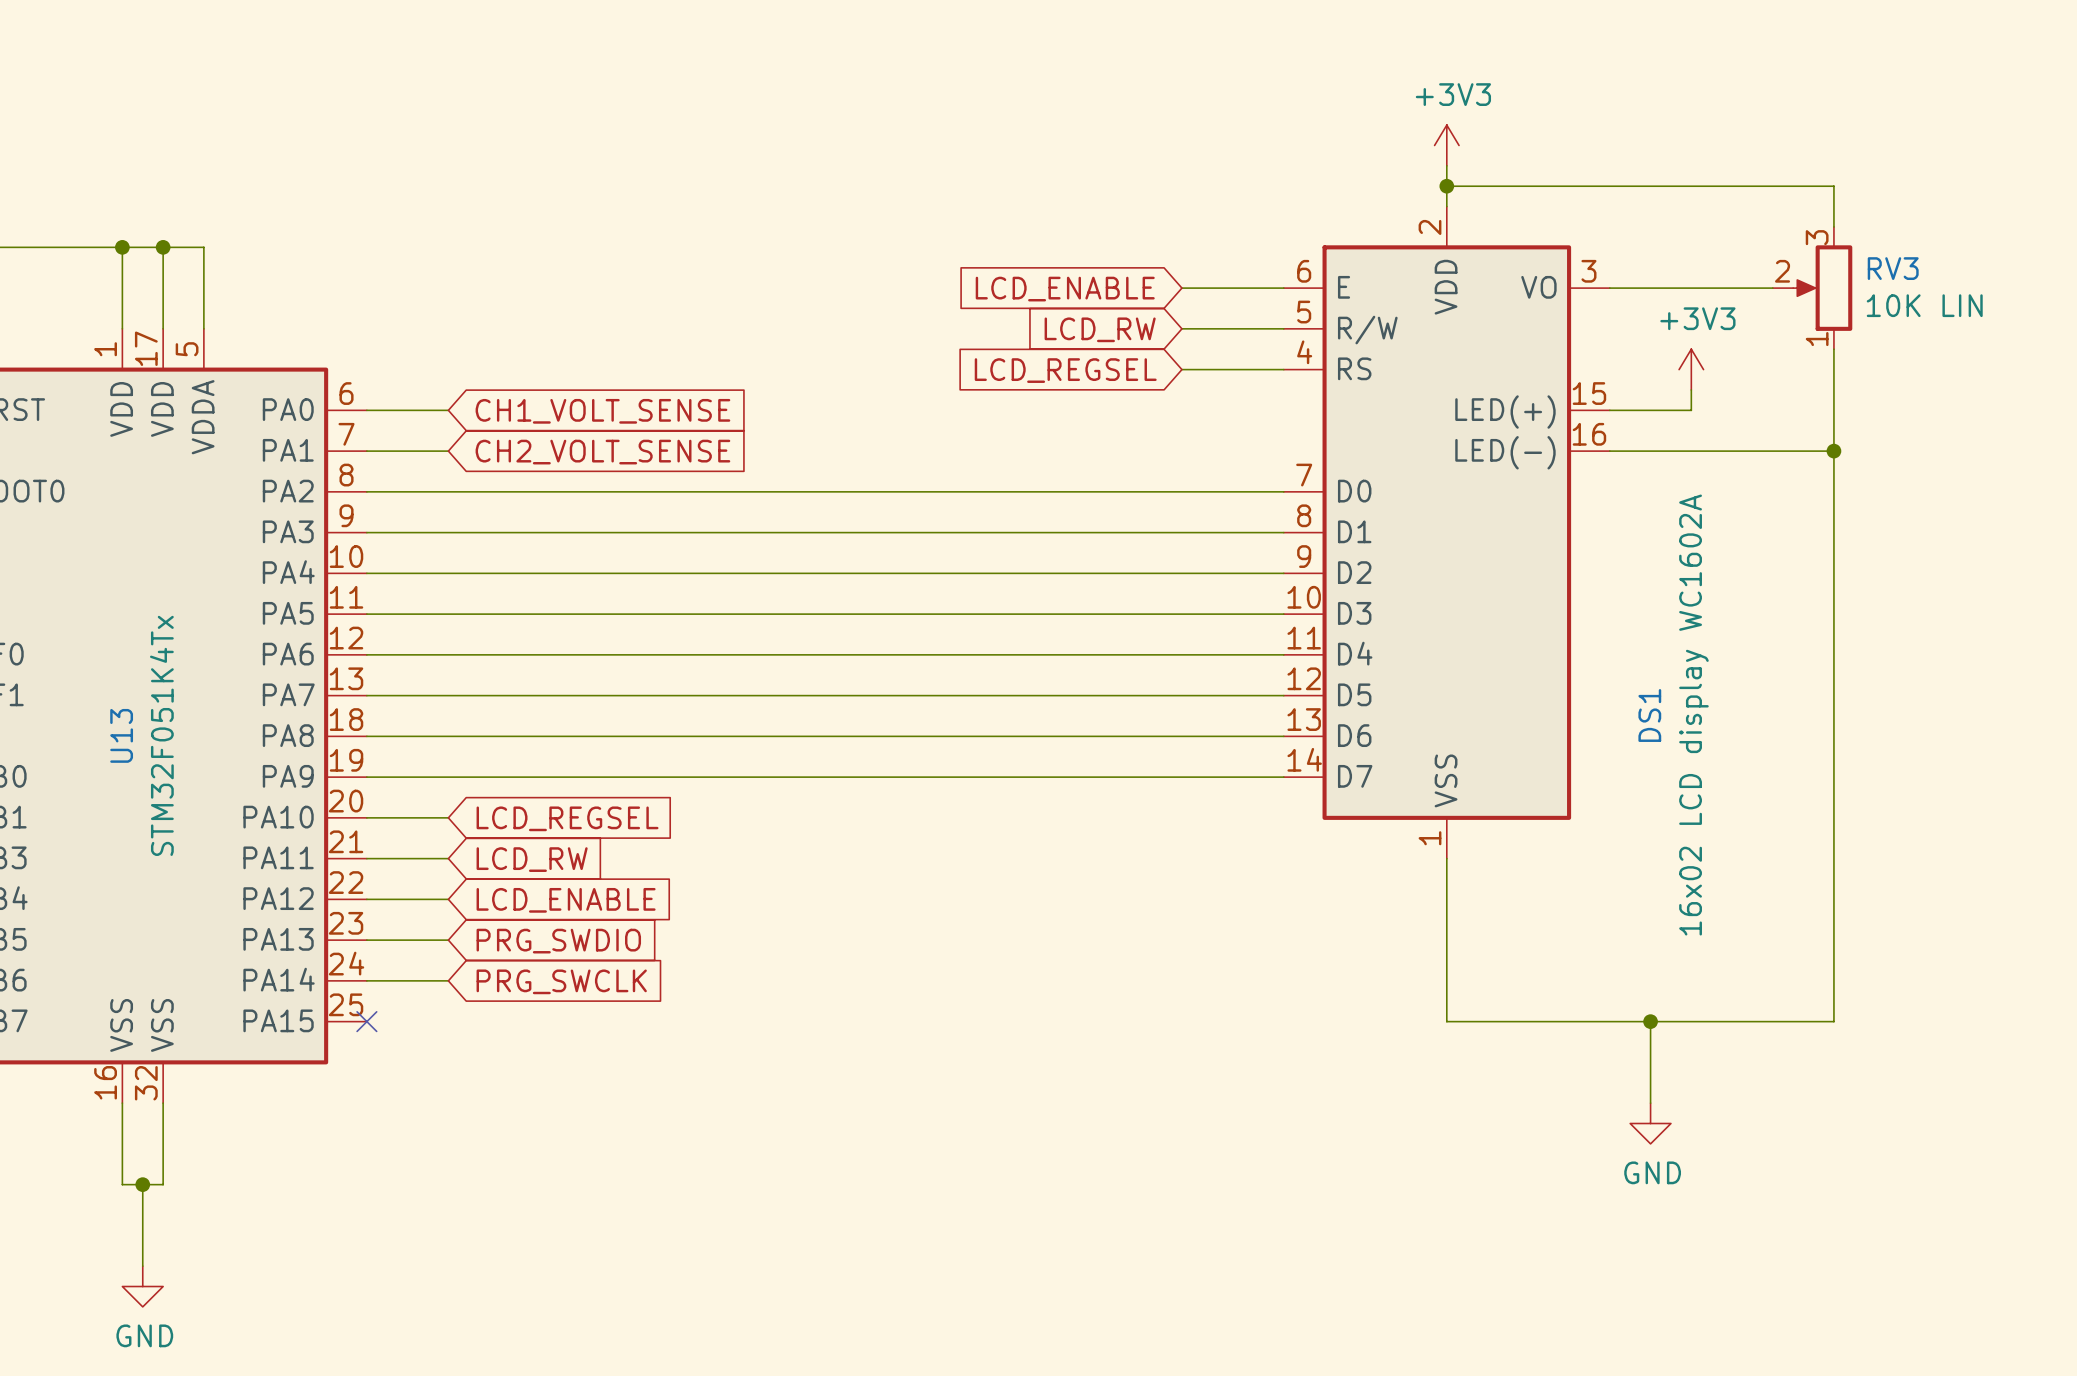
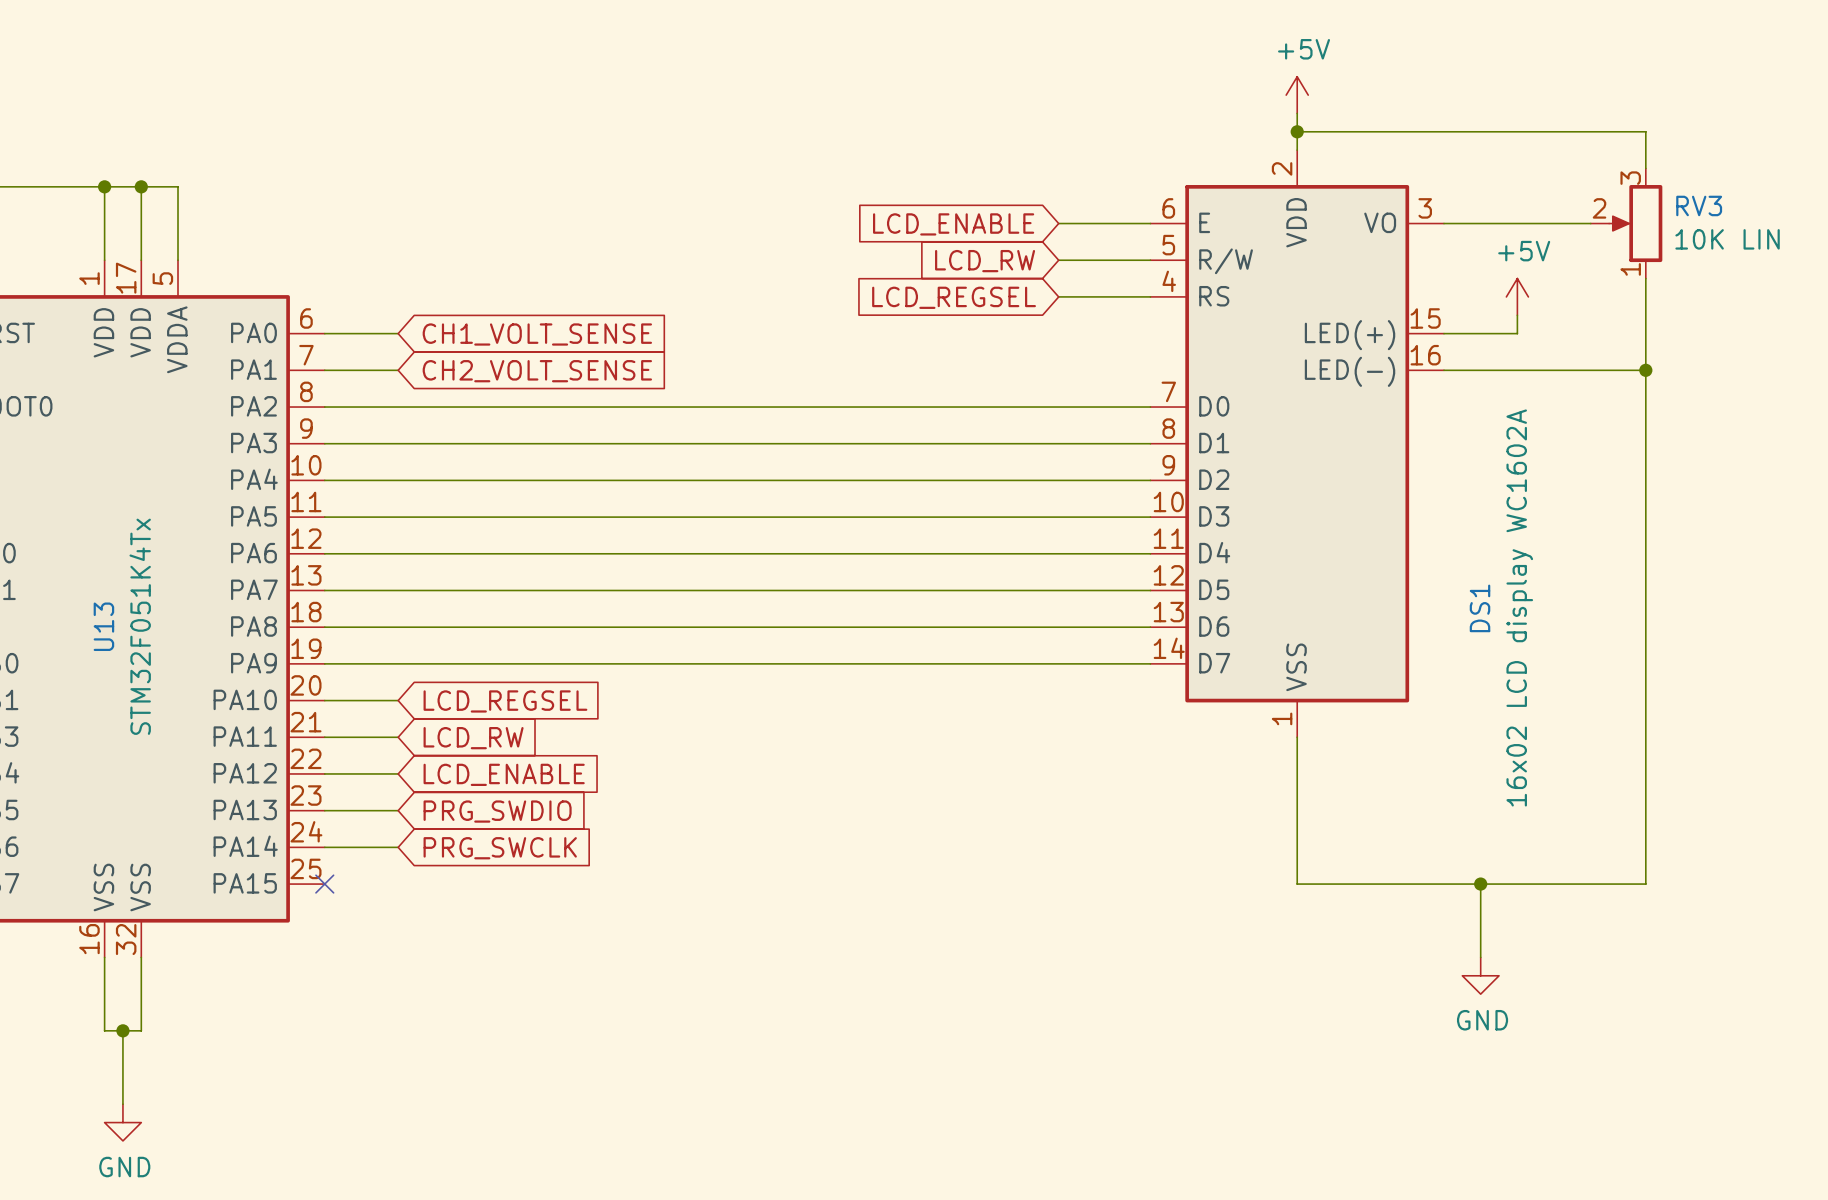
power symbol: +3V3 (1446, 145) -> +5V (1297, 95)
power symbol: +3V3 (1691, 369) -> +5V (1517, 296)

